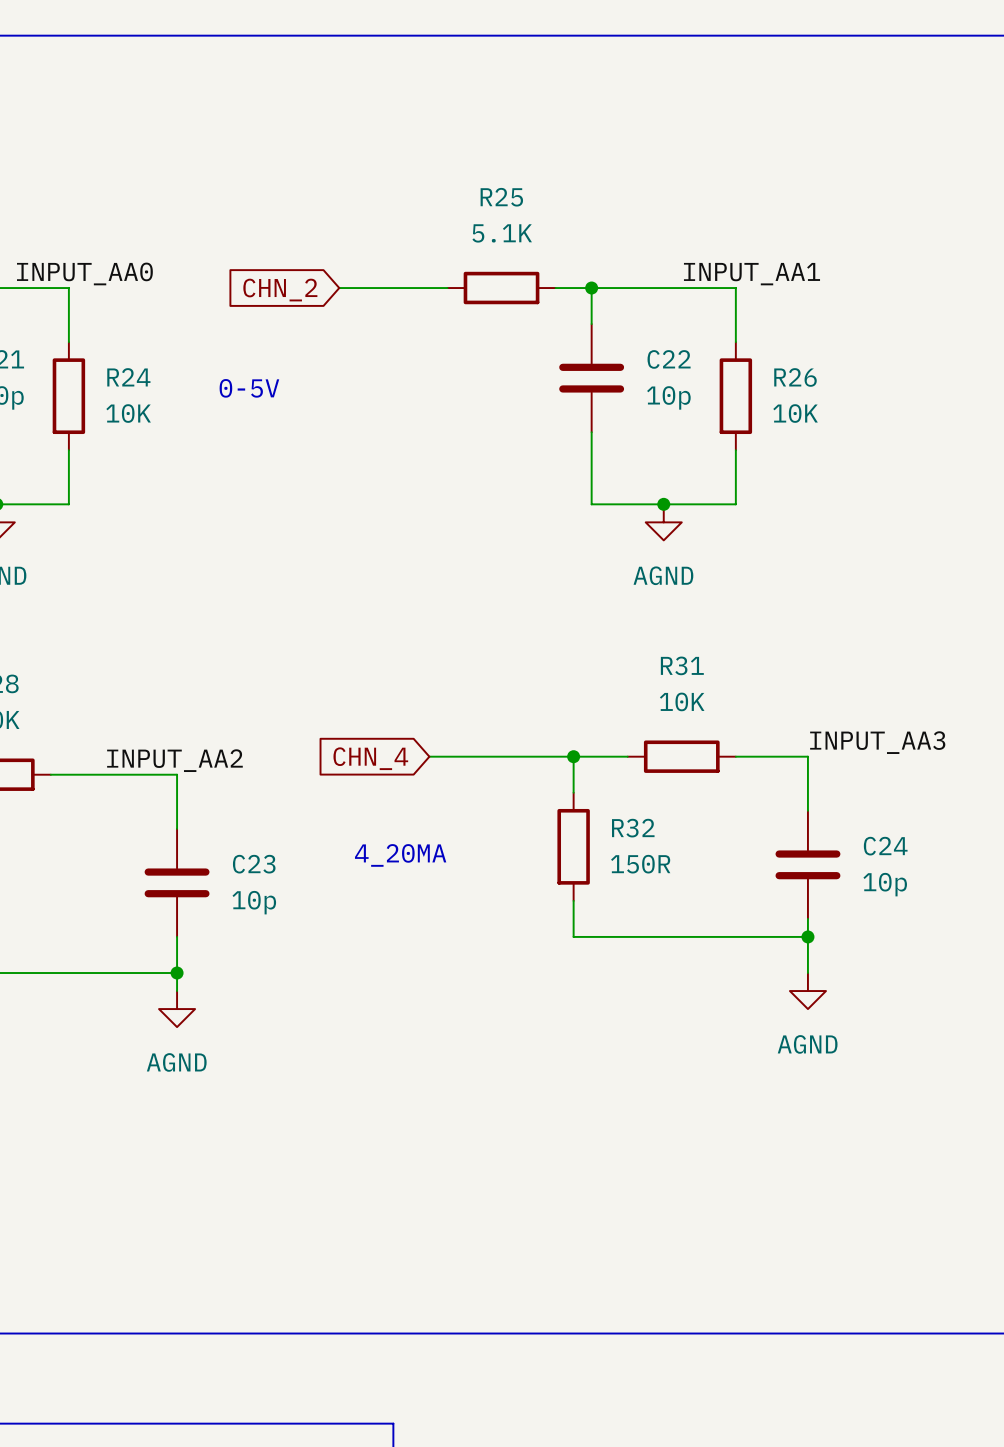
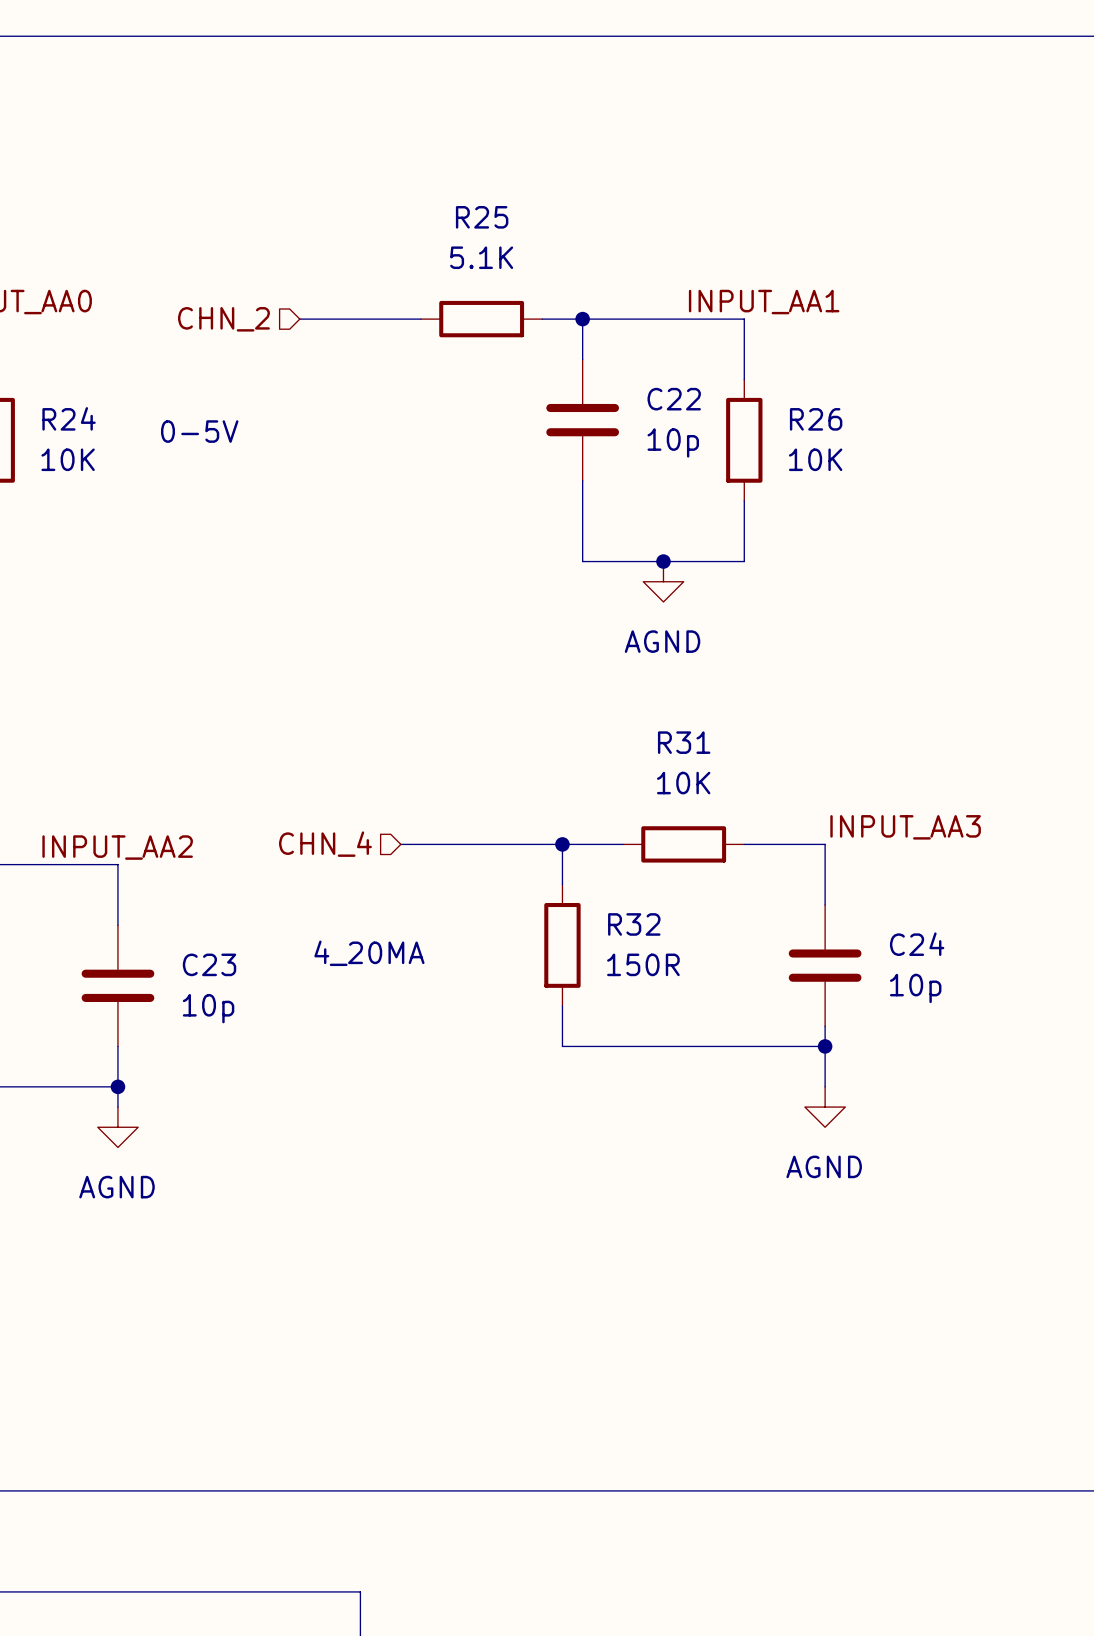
hierarchical label: none -> CHN_2 (223, 319)
global label: CHN_2 (280, 290) -> none
hierarchical label: none -> CHN_4 (325, 844)
global label: CHN_4 (370, 758) -> none

